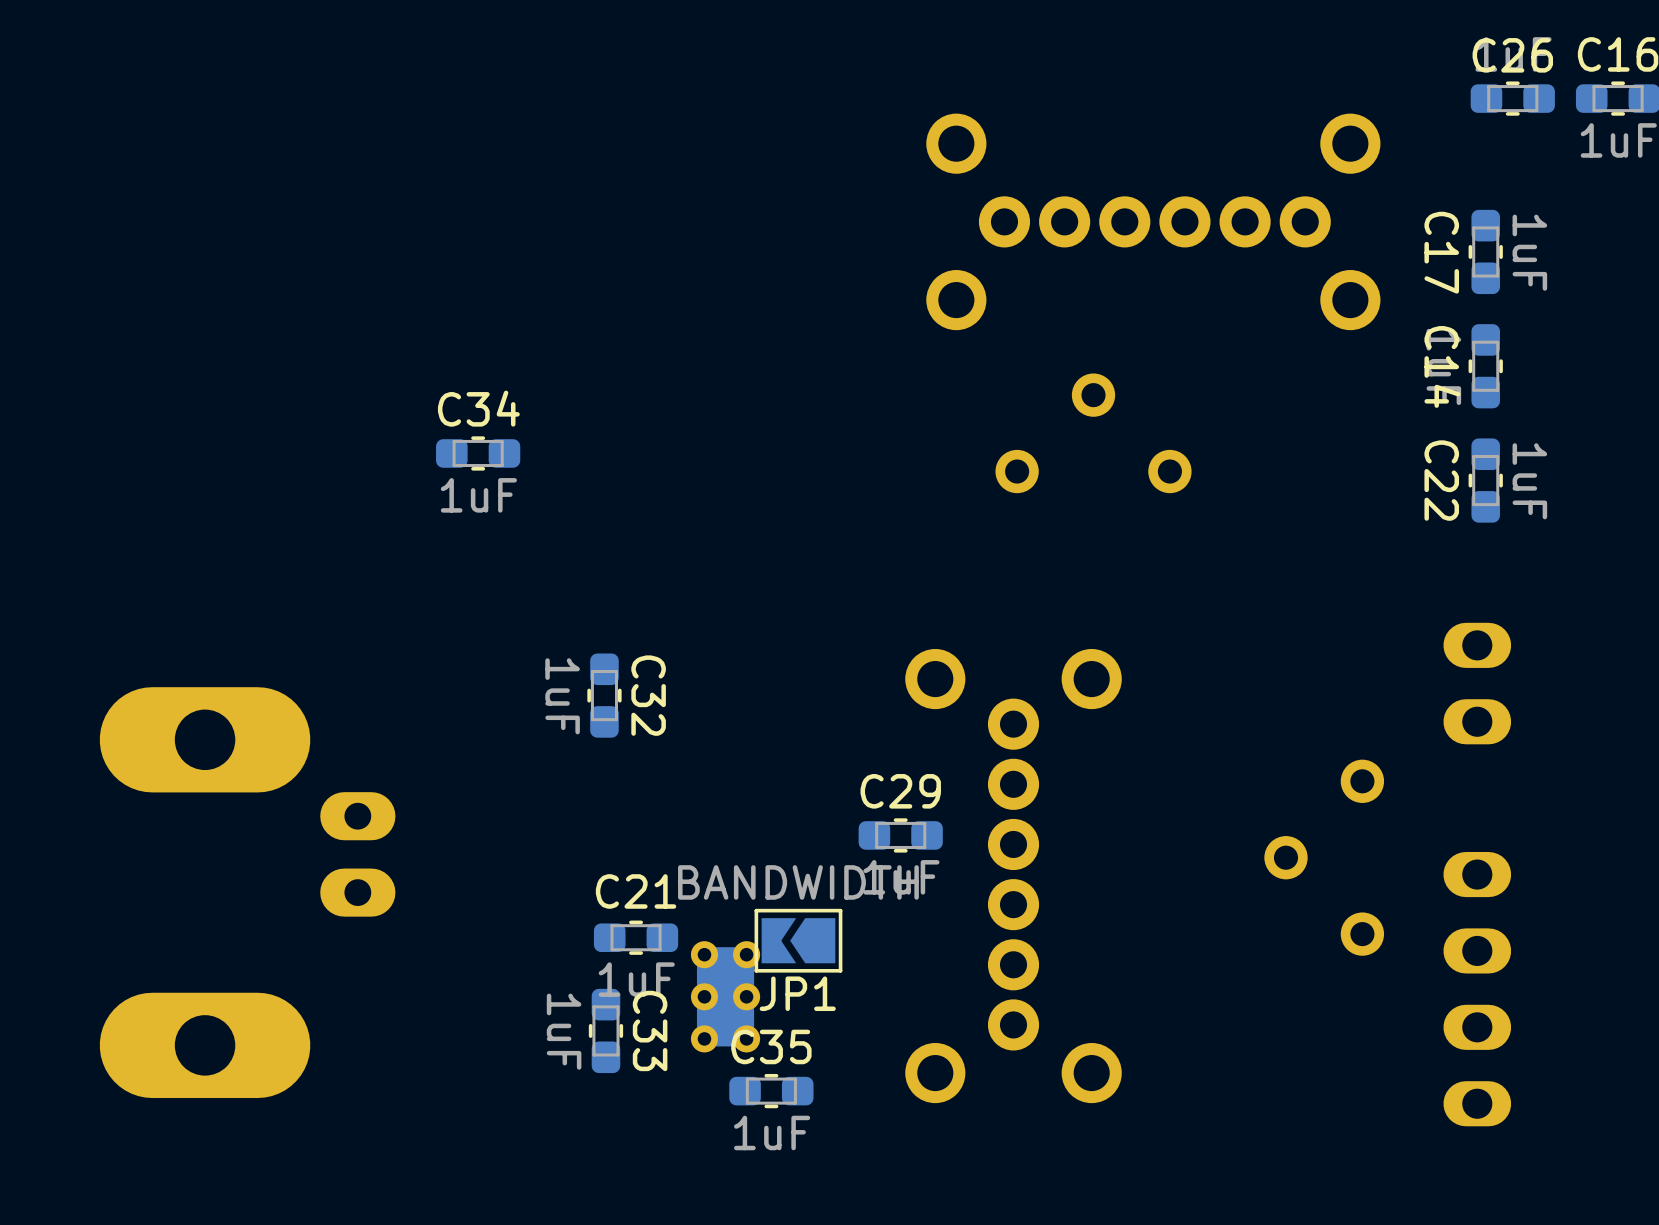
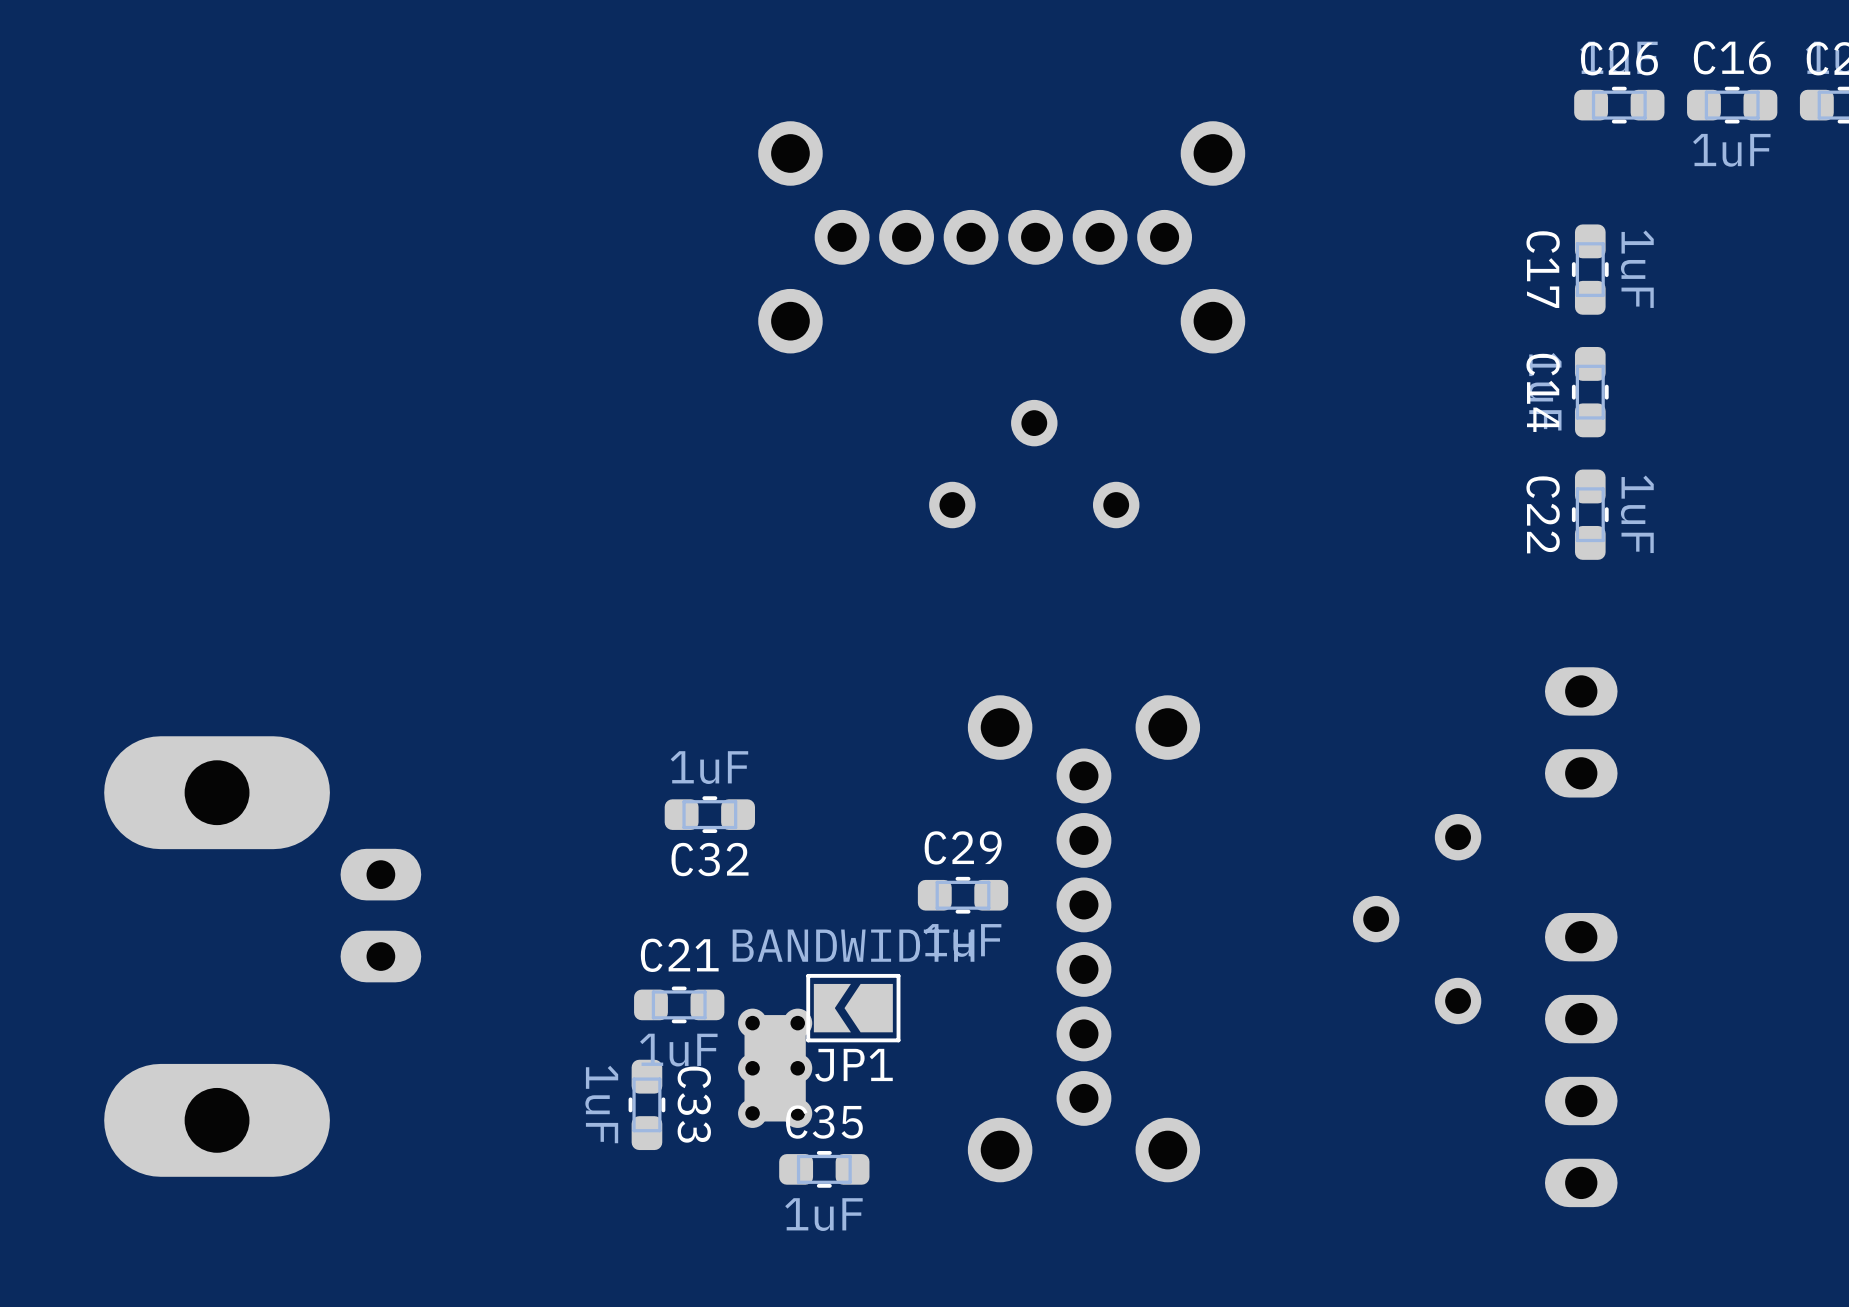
part position: (1153, 221) -> (1001, 237)
part position: (1093, 433) -> (1034, 464)
C34: 1uF (478, 453) -> none
C32 rotation: 0° (604, 695) -> 90° clockwise (709, 814)
C32 position: (604, 695) -> (709, 814)

